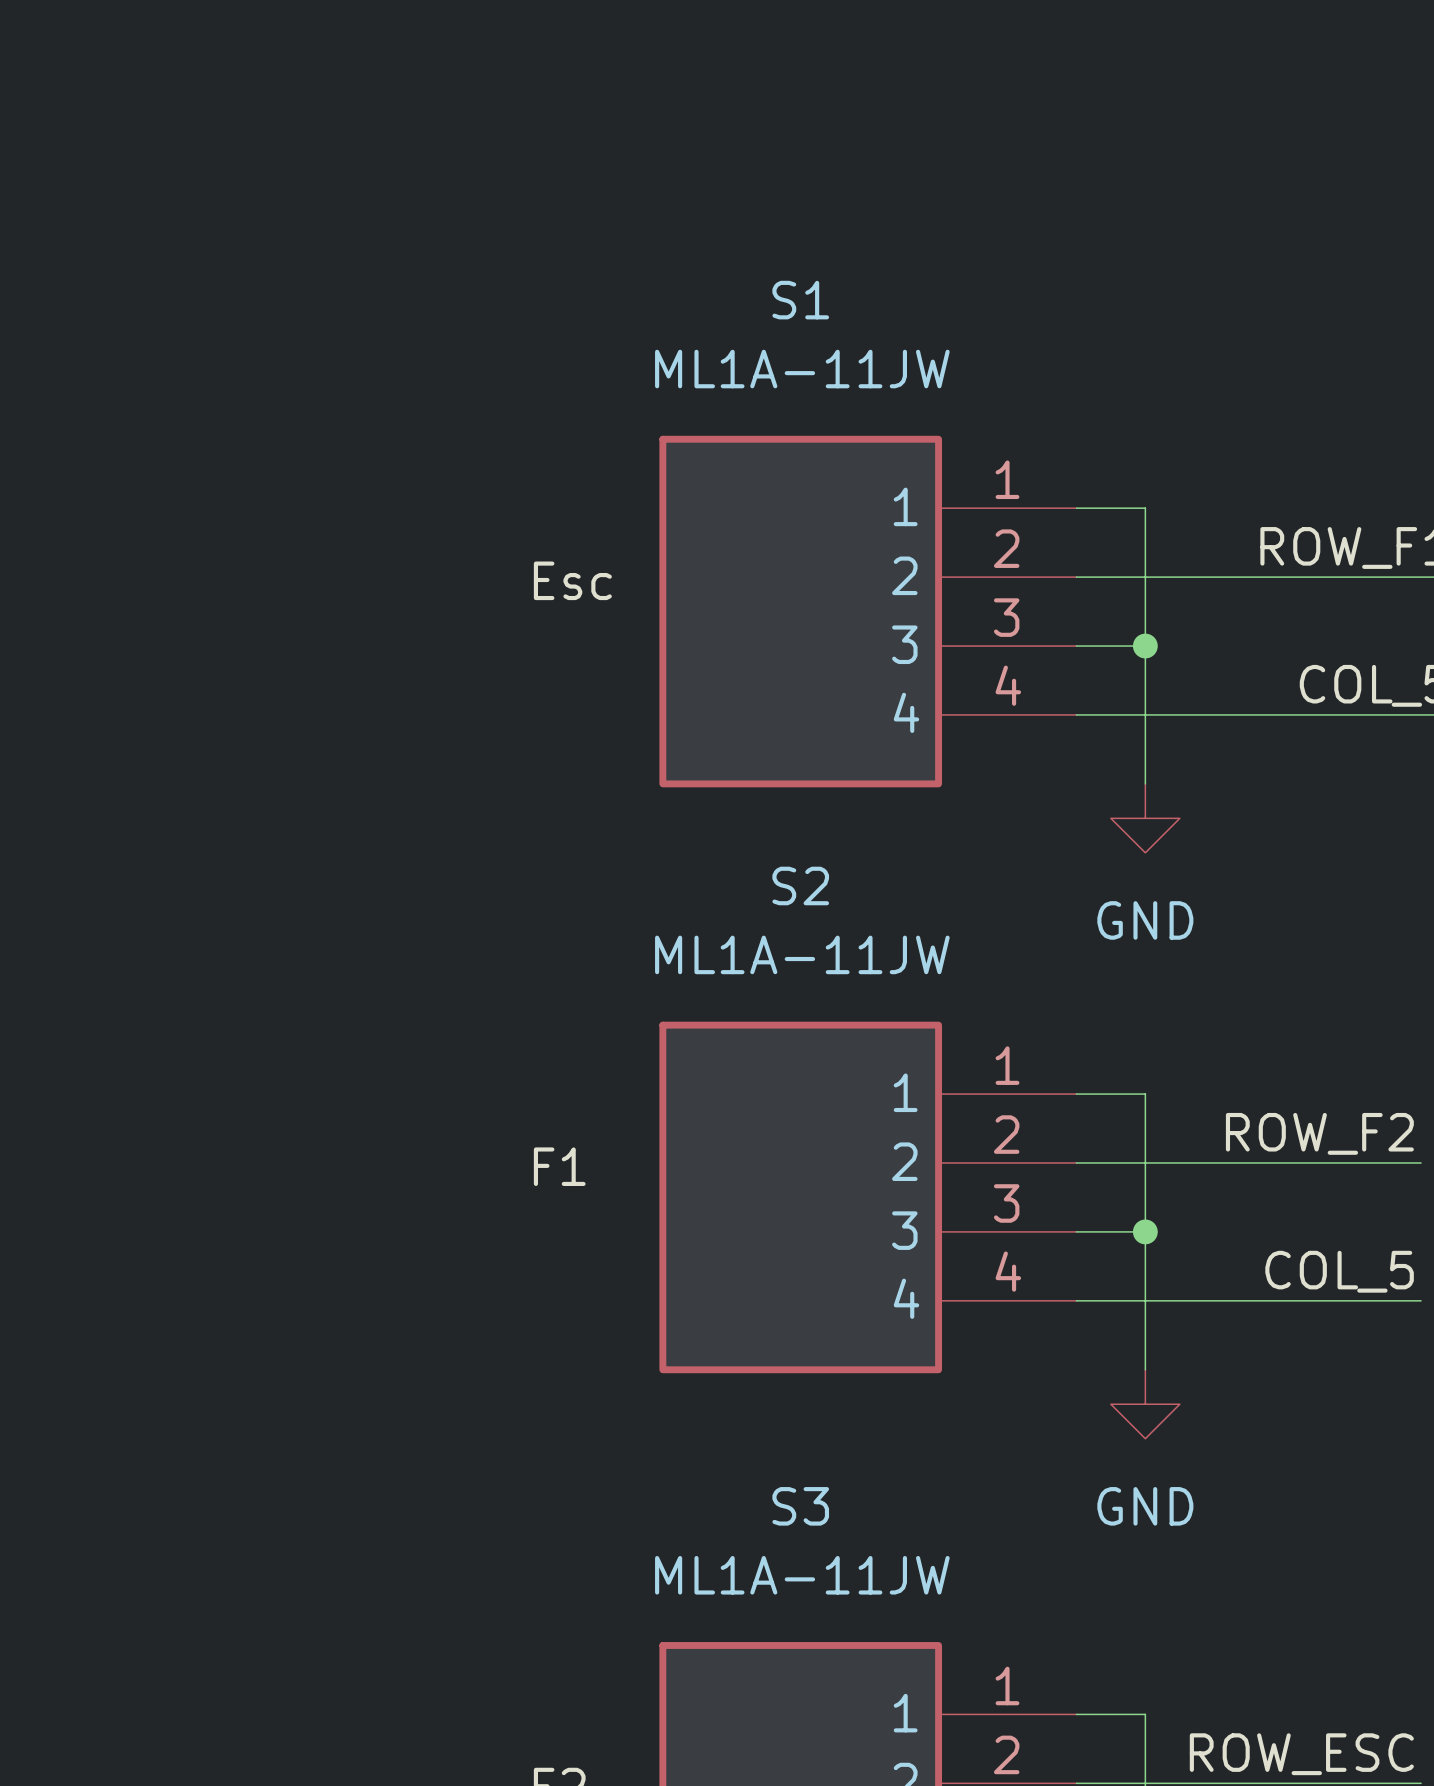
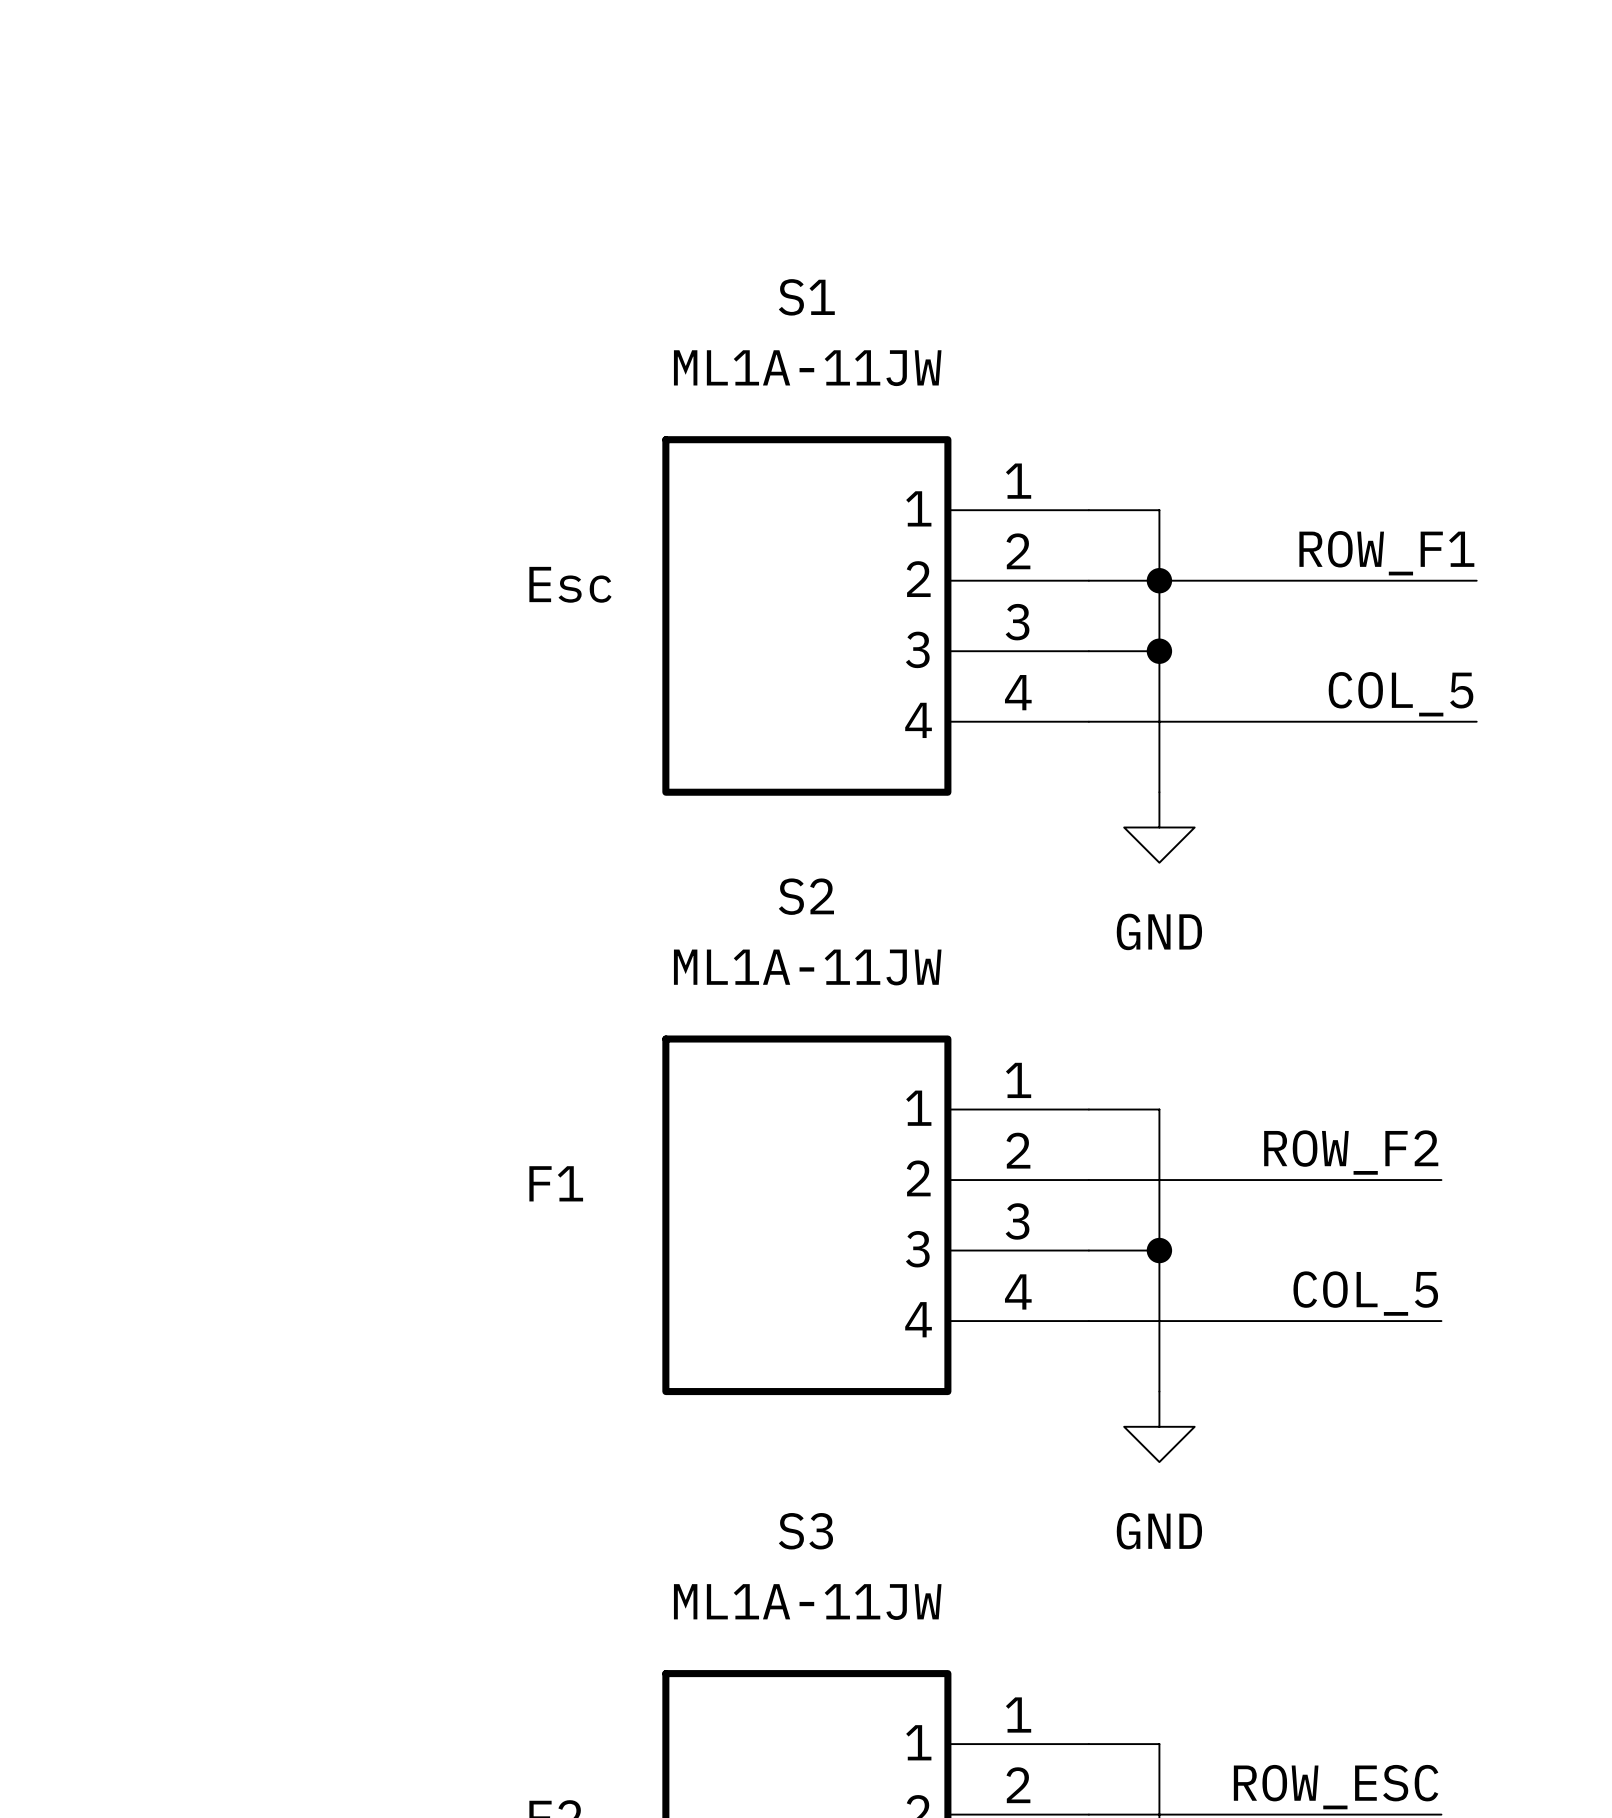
junction: none -> (1159, 580)

